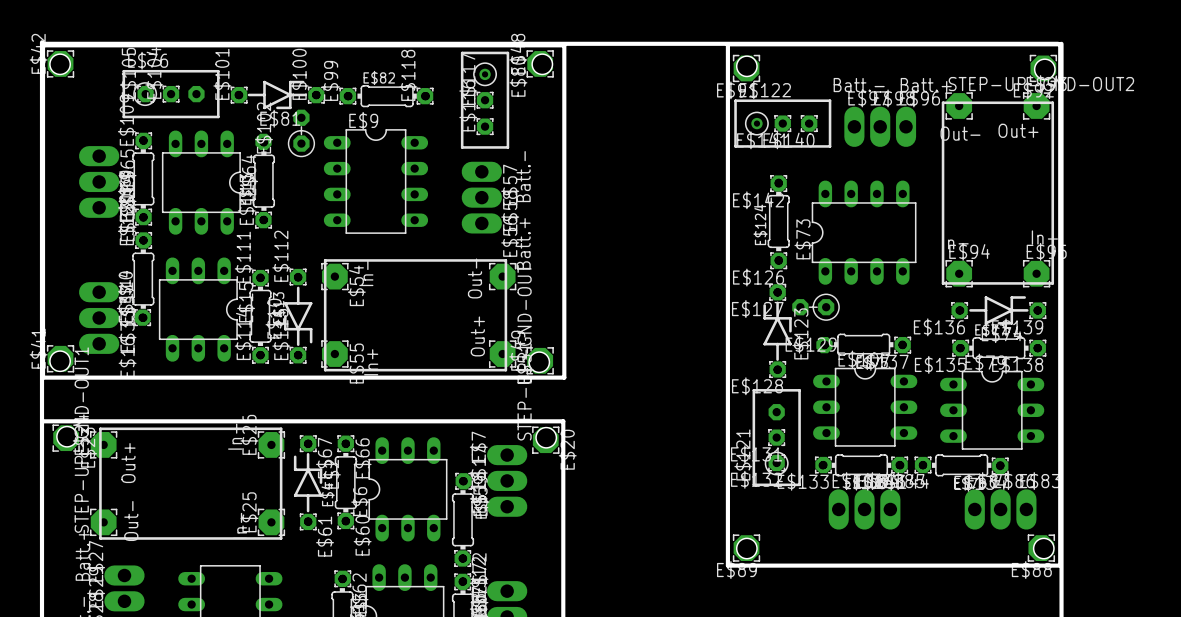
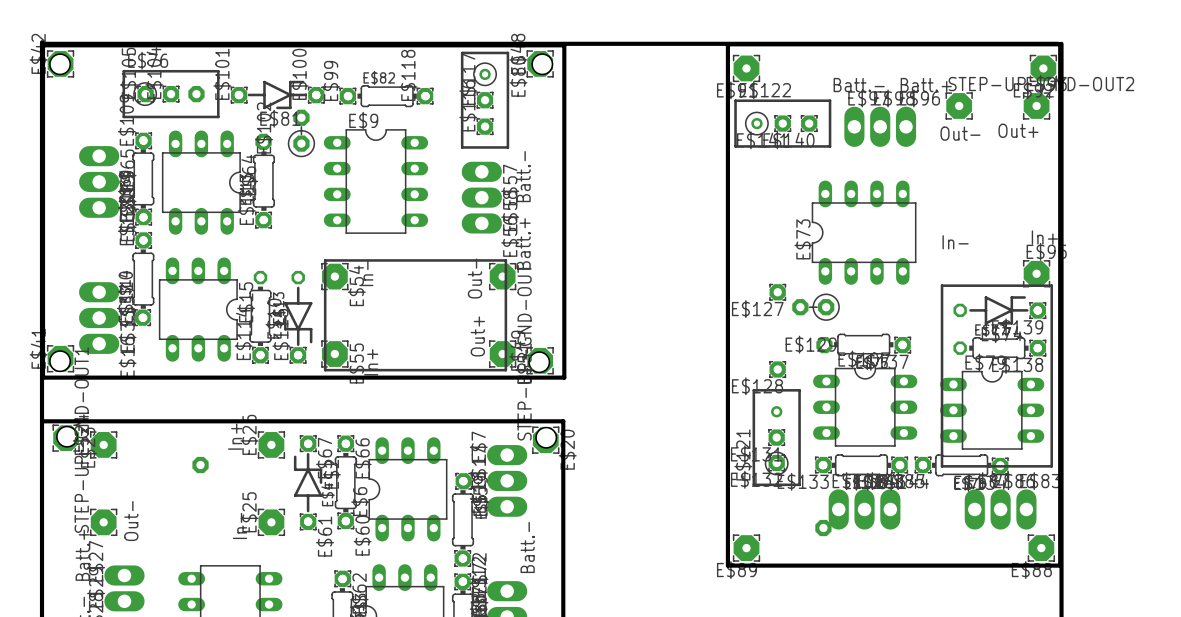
hole: (746, 66) -> none
hole: (1044, 69) -> none
line: (943, 102) (943, 283) (1052, 283) (1052, 102) (943, 102) -> (942, 285) (942, 466) (1051, 466) (1051, 285) (942, 285)
E$142: (778, 183) -> none
E$124: (778, 221) -> none
E$126: (778, 260) -> none
E$94: (959, 273) -> none
E$112: (298, 277) -> none
E$111: (260, 278) -> none
E$136: (959, 310) -> none
E$123: (777, 331) -> none
E$135: (960, 348) -> none
part position: (776, 412) -> (823, 528)
line: (100, 428) (281, 428) (281, 538) (100, 538) (100, 428) -> none
text: Out+ (128, 463) -> none
part: none -> (200, 465)
text: none -> Batt.- (527, 547)
hole: (746, 548) -> none
hole: (1043, 548) -> none

